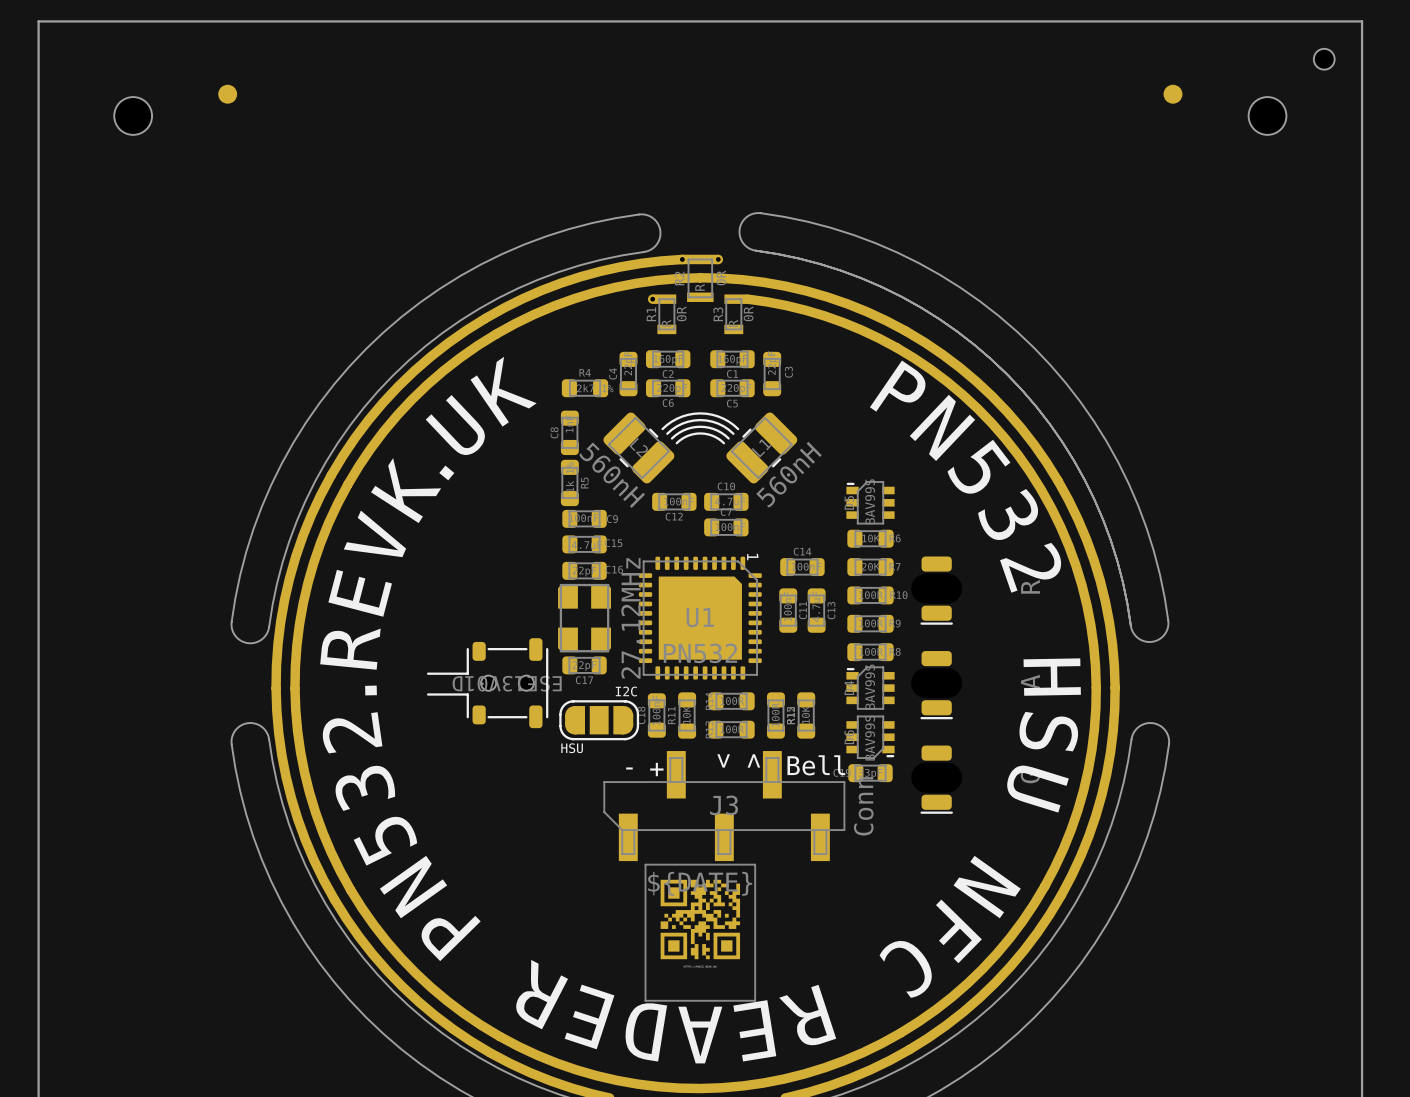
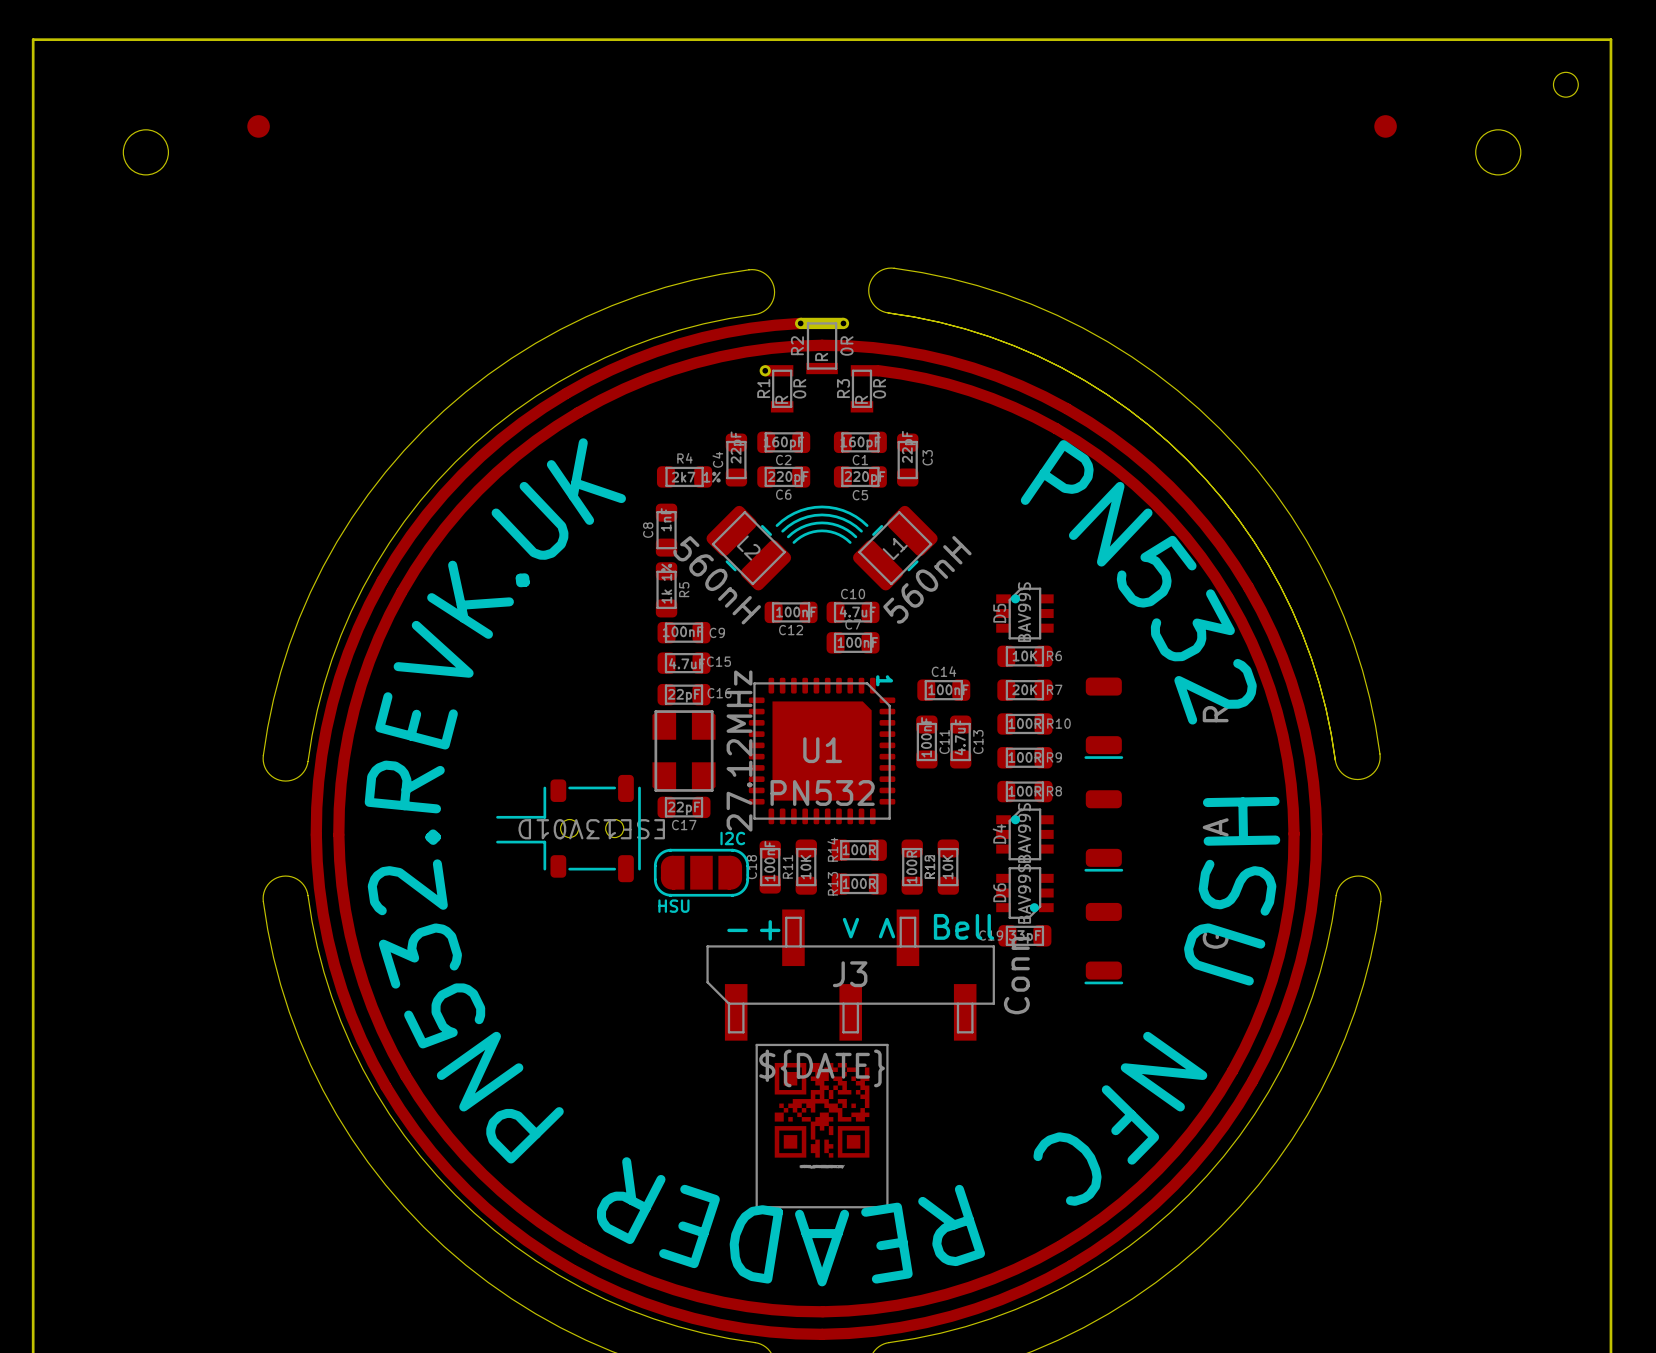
D5 footprint: [846, 481, 895, 525] -> [996, 587, 1054, 640]
D4 footprint: [846, 666, 895, 710] -> [996, 808, 1054, 861]
D6 footprint: [846, 715, 895, 759] -> [996, 867, 1054, 919]

